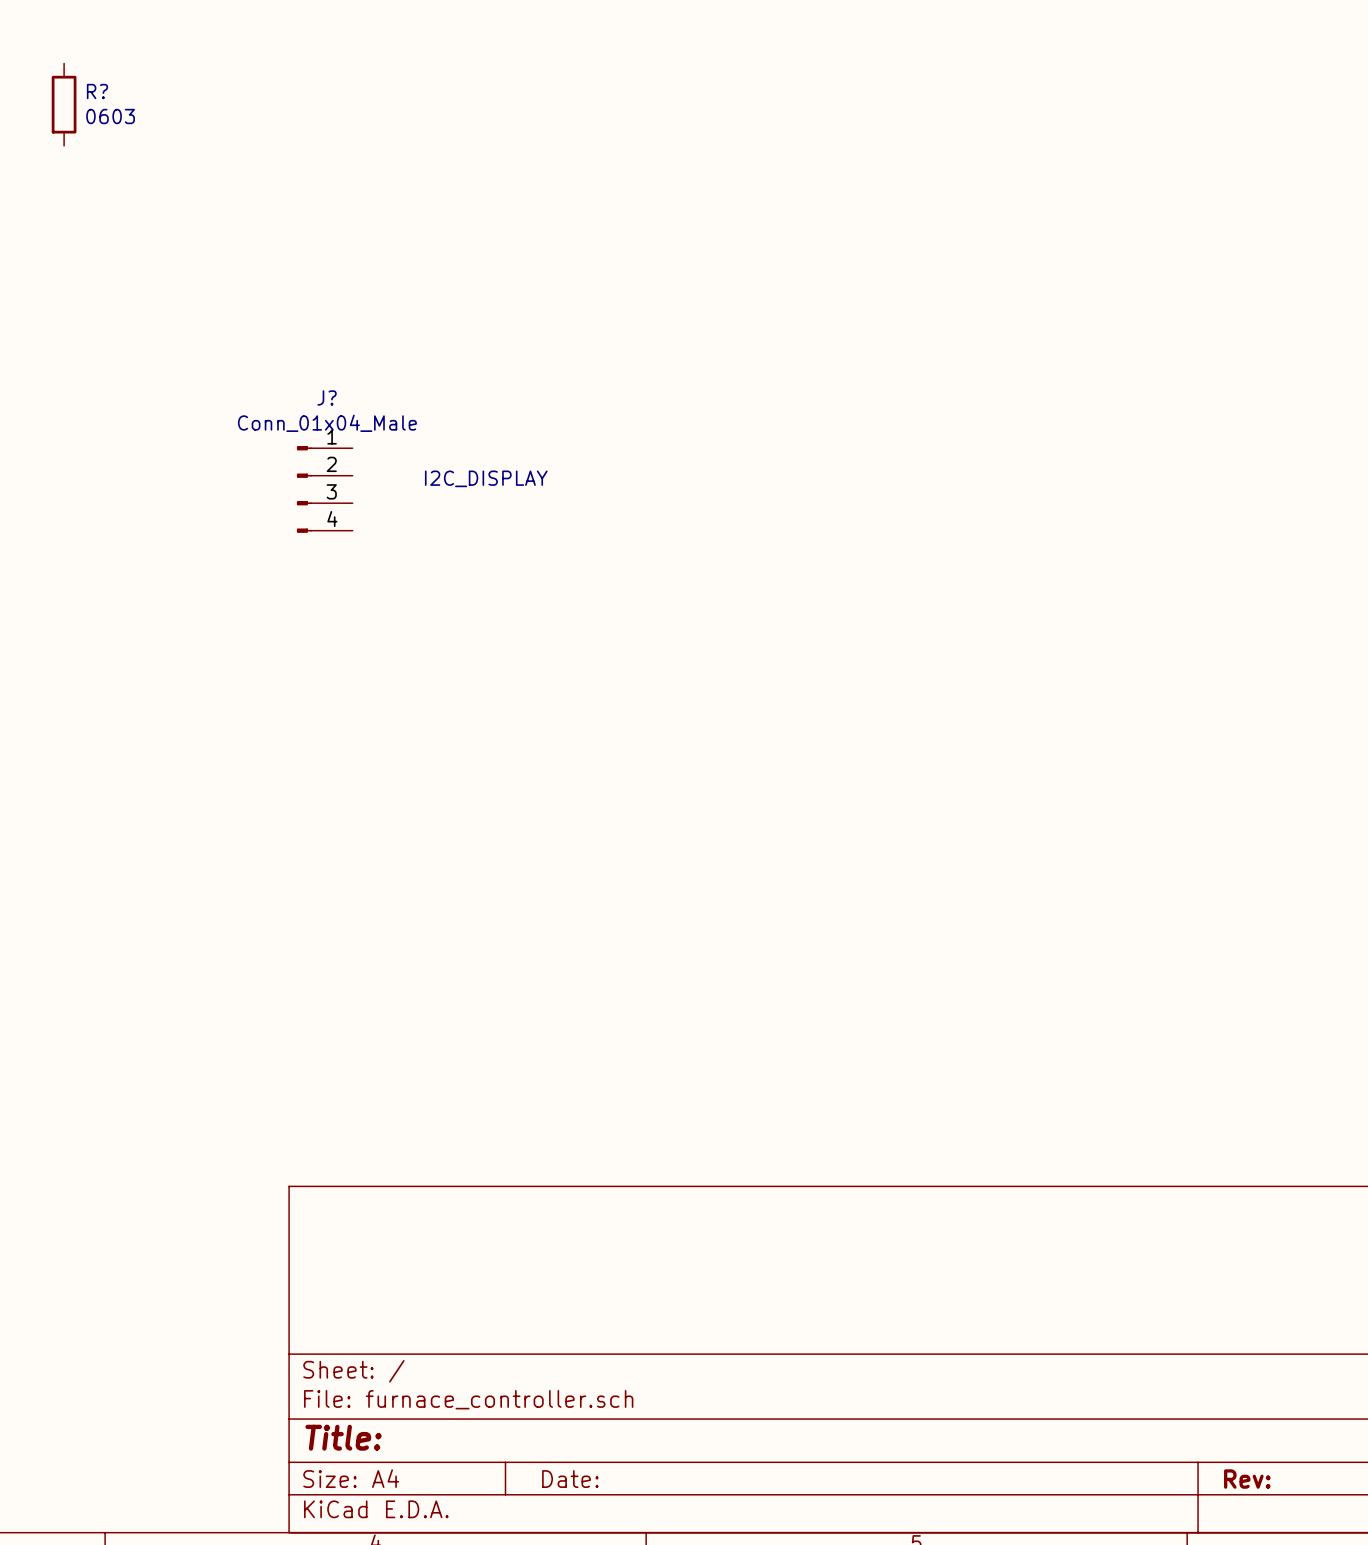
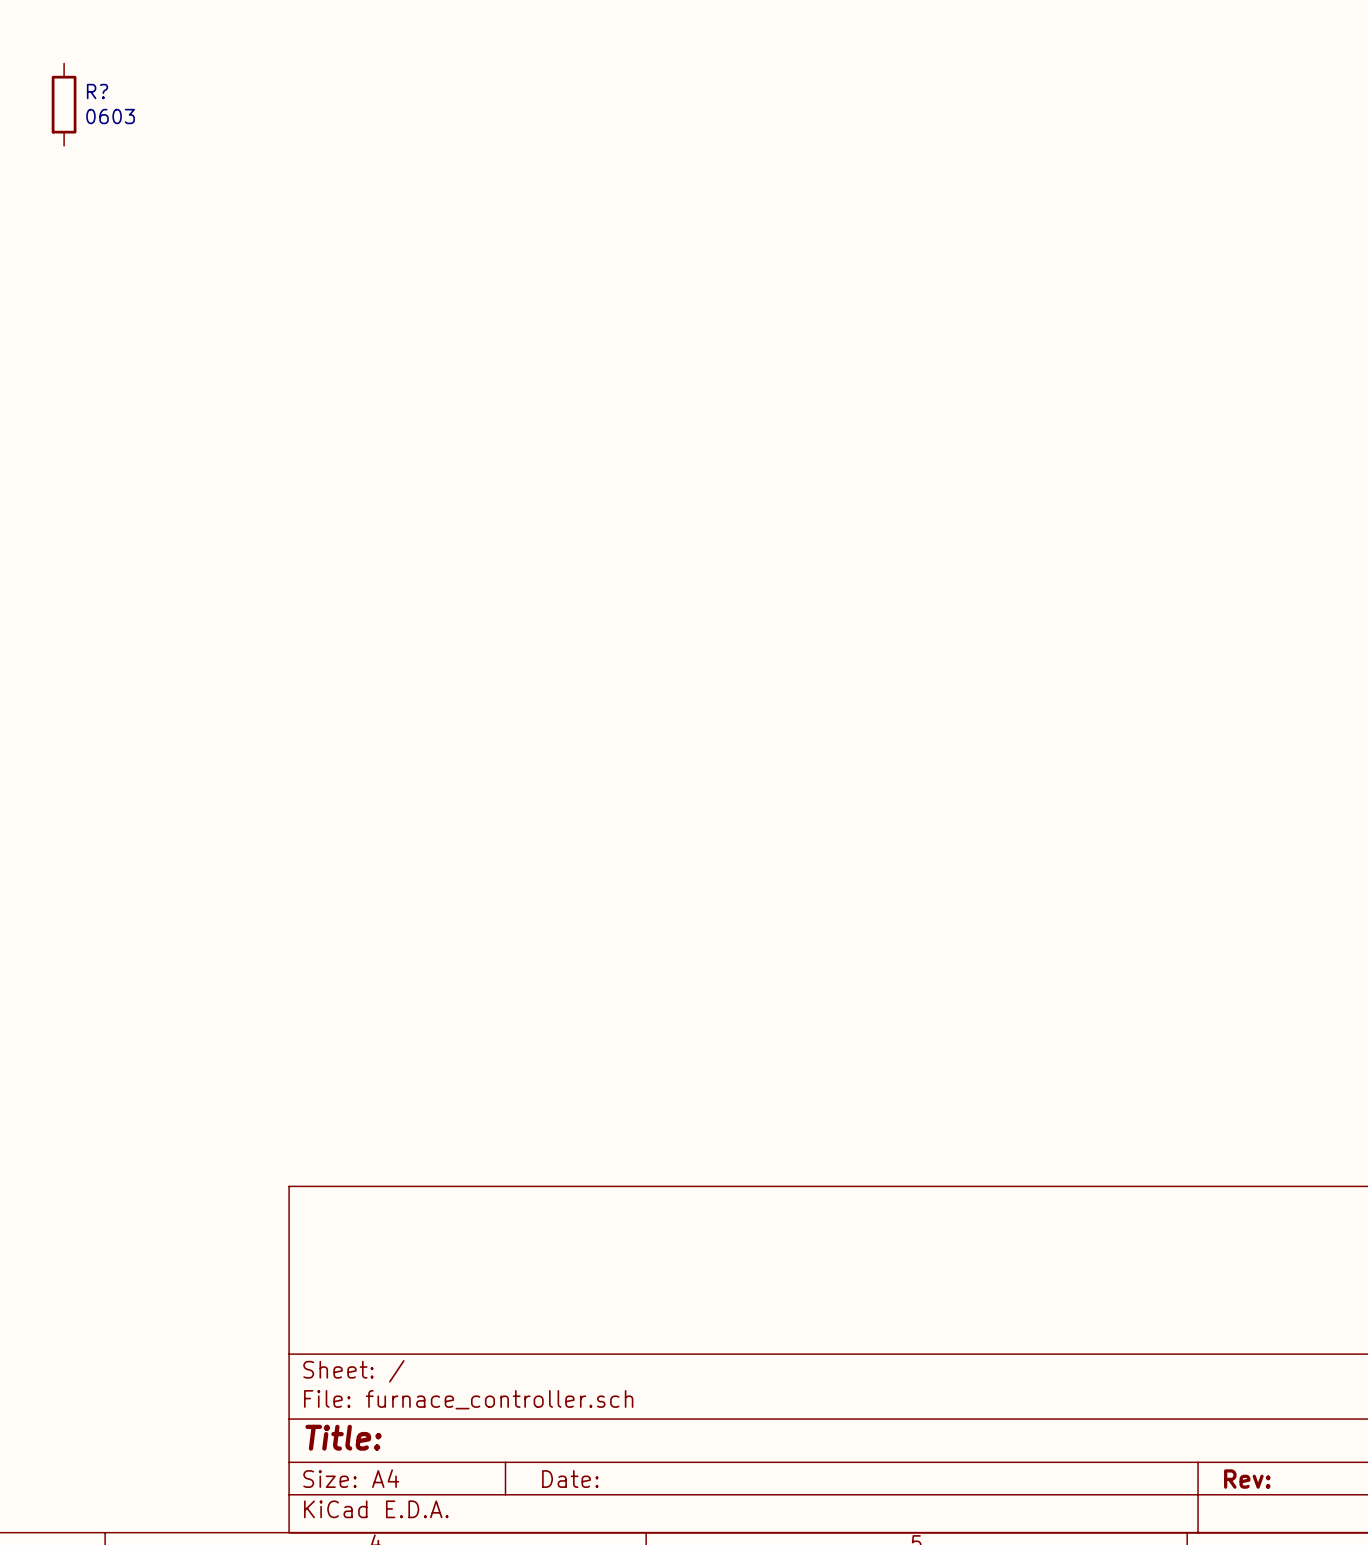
text: I2C_DISPLAY (486, 478) -> none
J?: Conn_01x04_Male (324, 489) -> none

